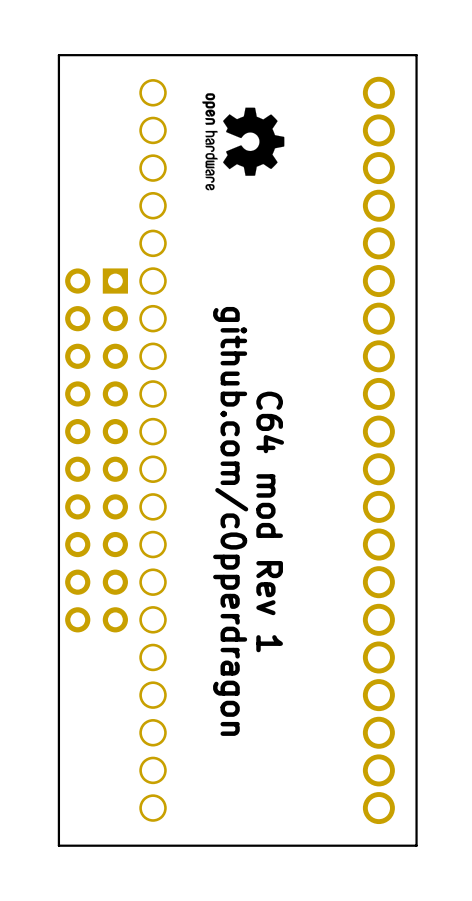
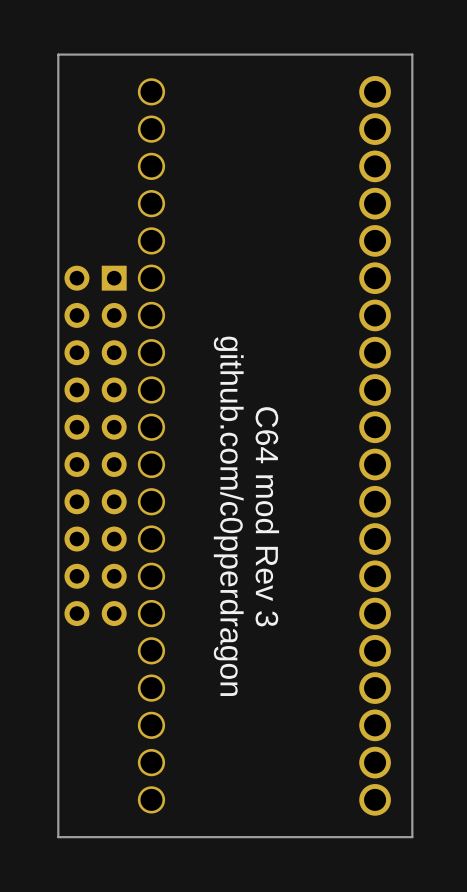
drawing: [202, 93, 285, 191] -> none
text: C64 mod Rev 1 (270, 521) -> C64 mod Rev 3 (267, 516)

